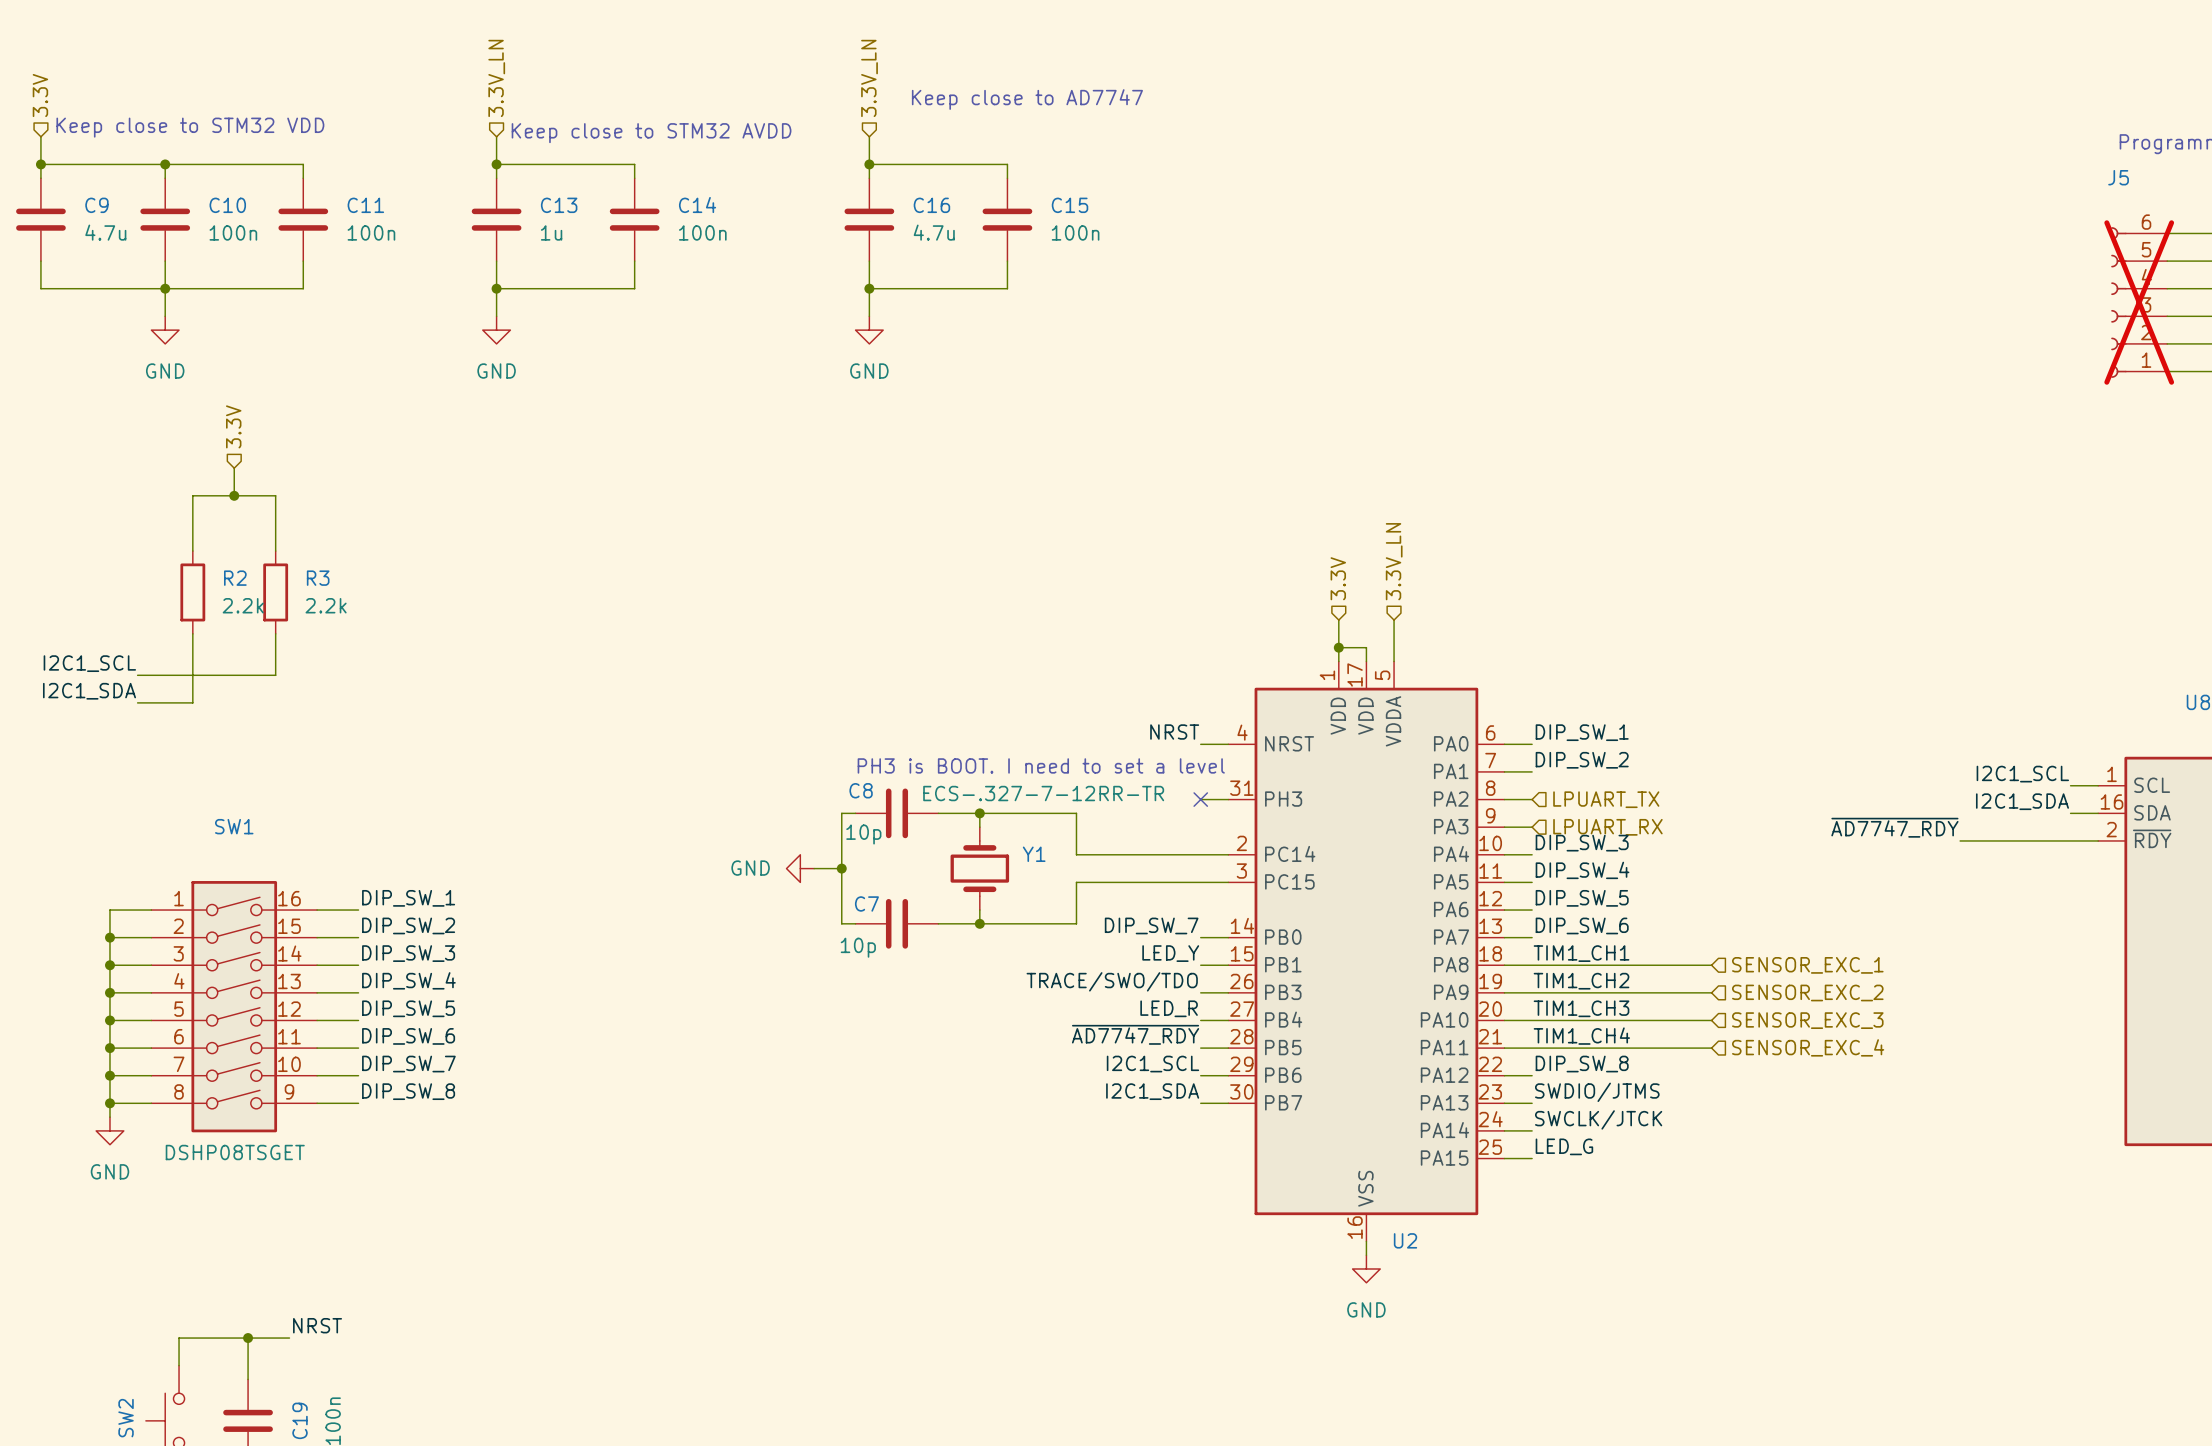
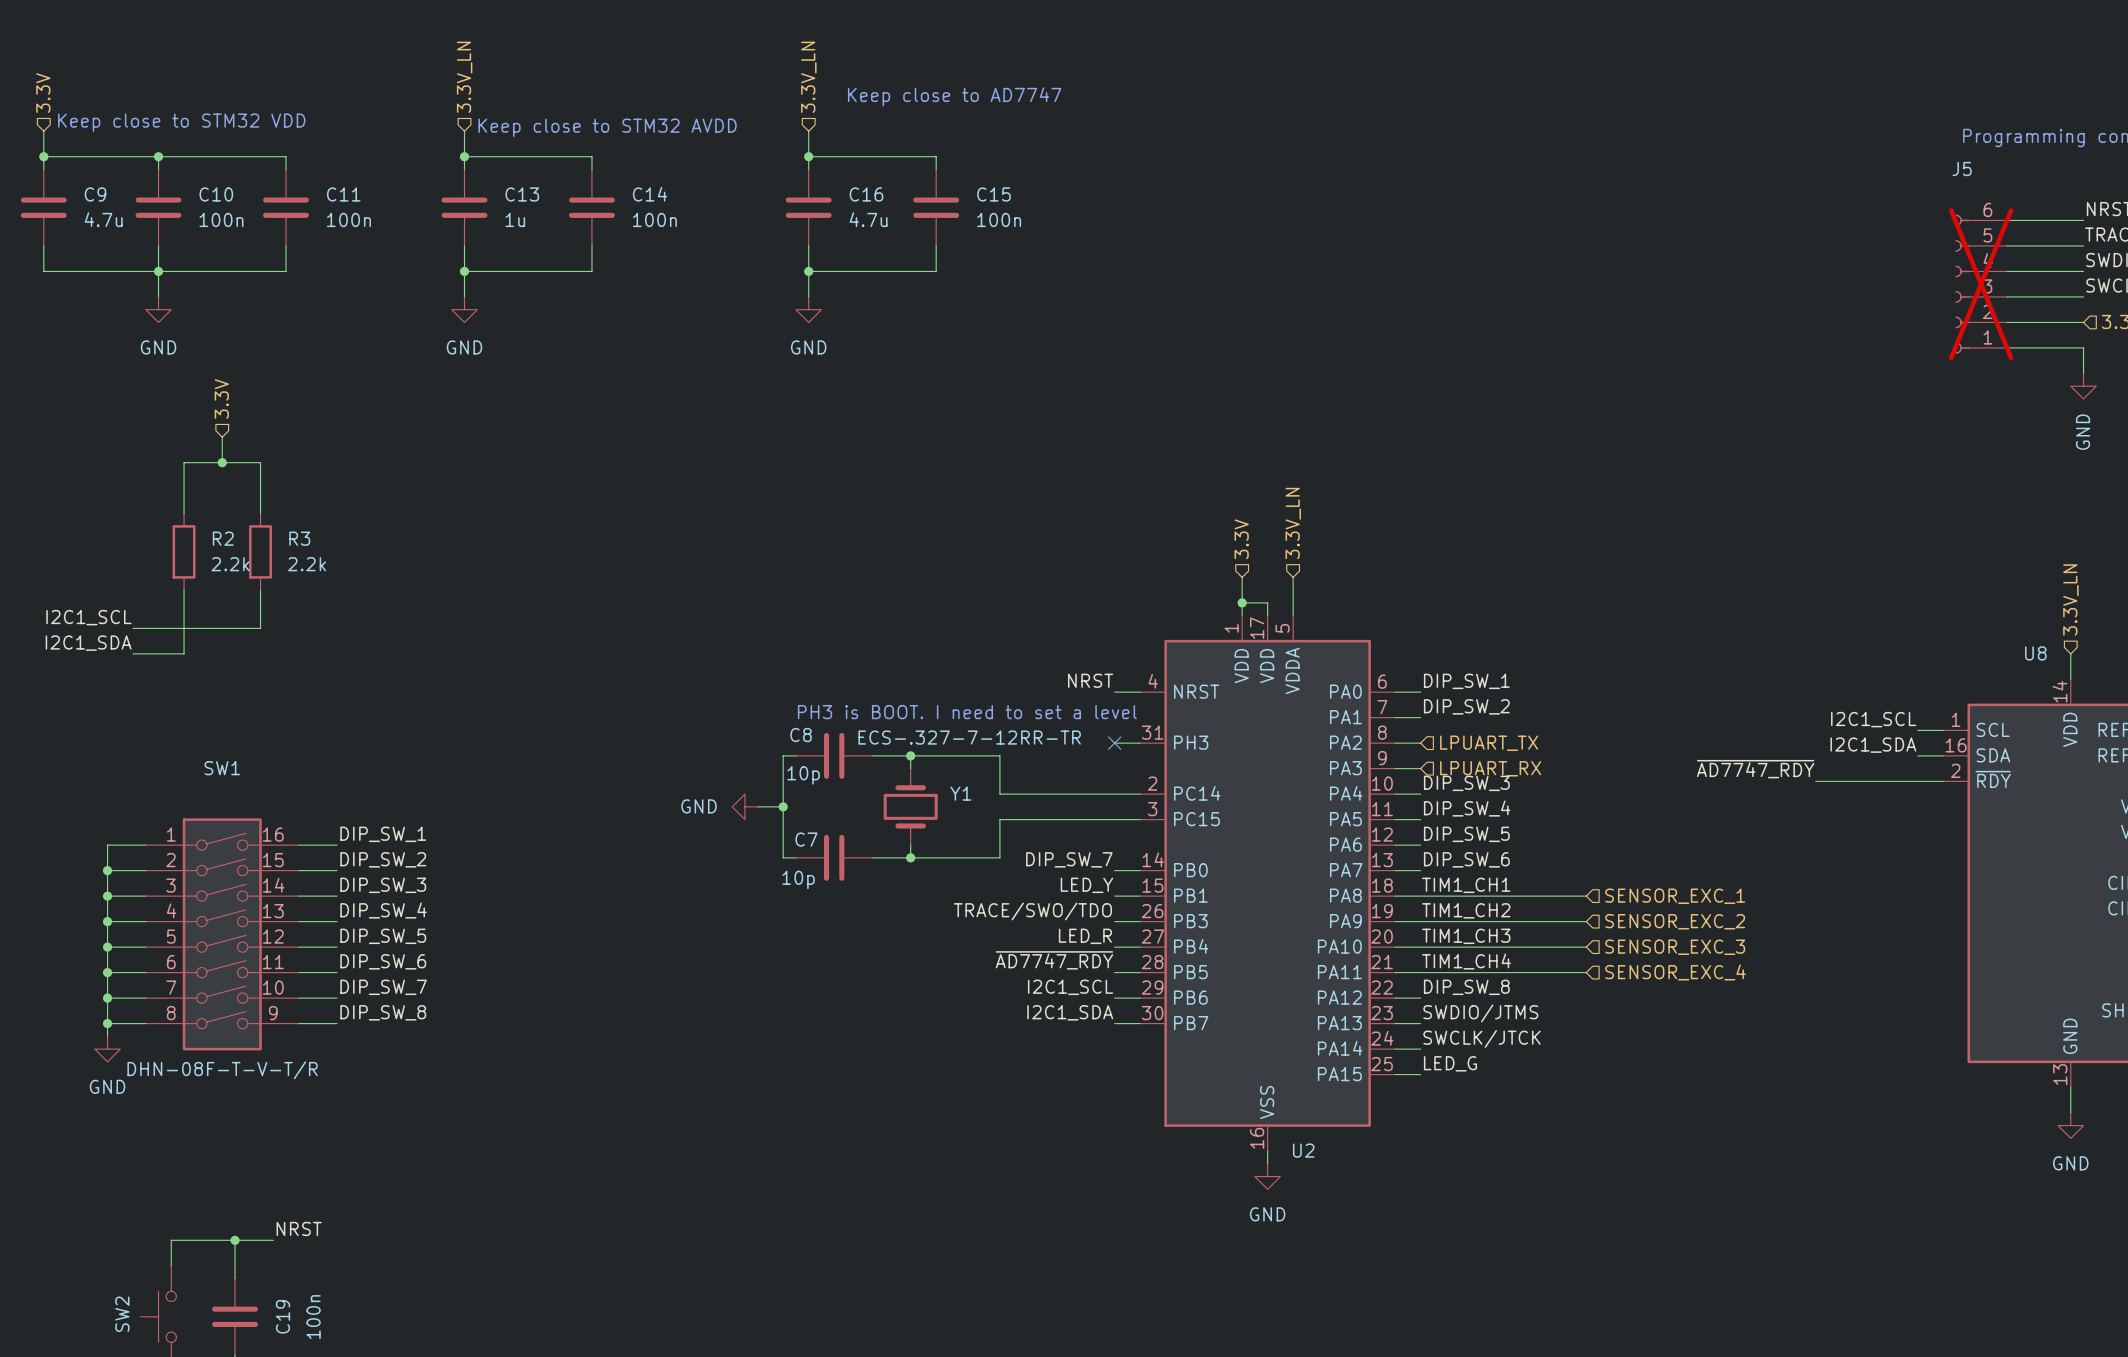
SW1 text: DSHP08TSGET (235, 1152) -> DHN-08F-T-V-T/R (222, 1070)

